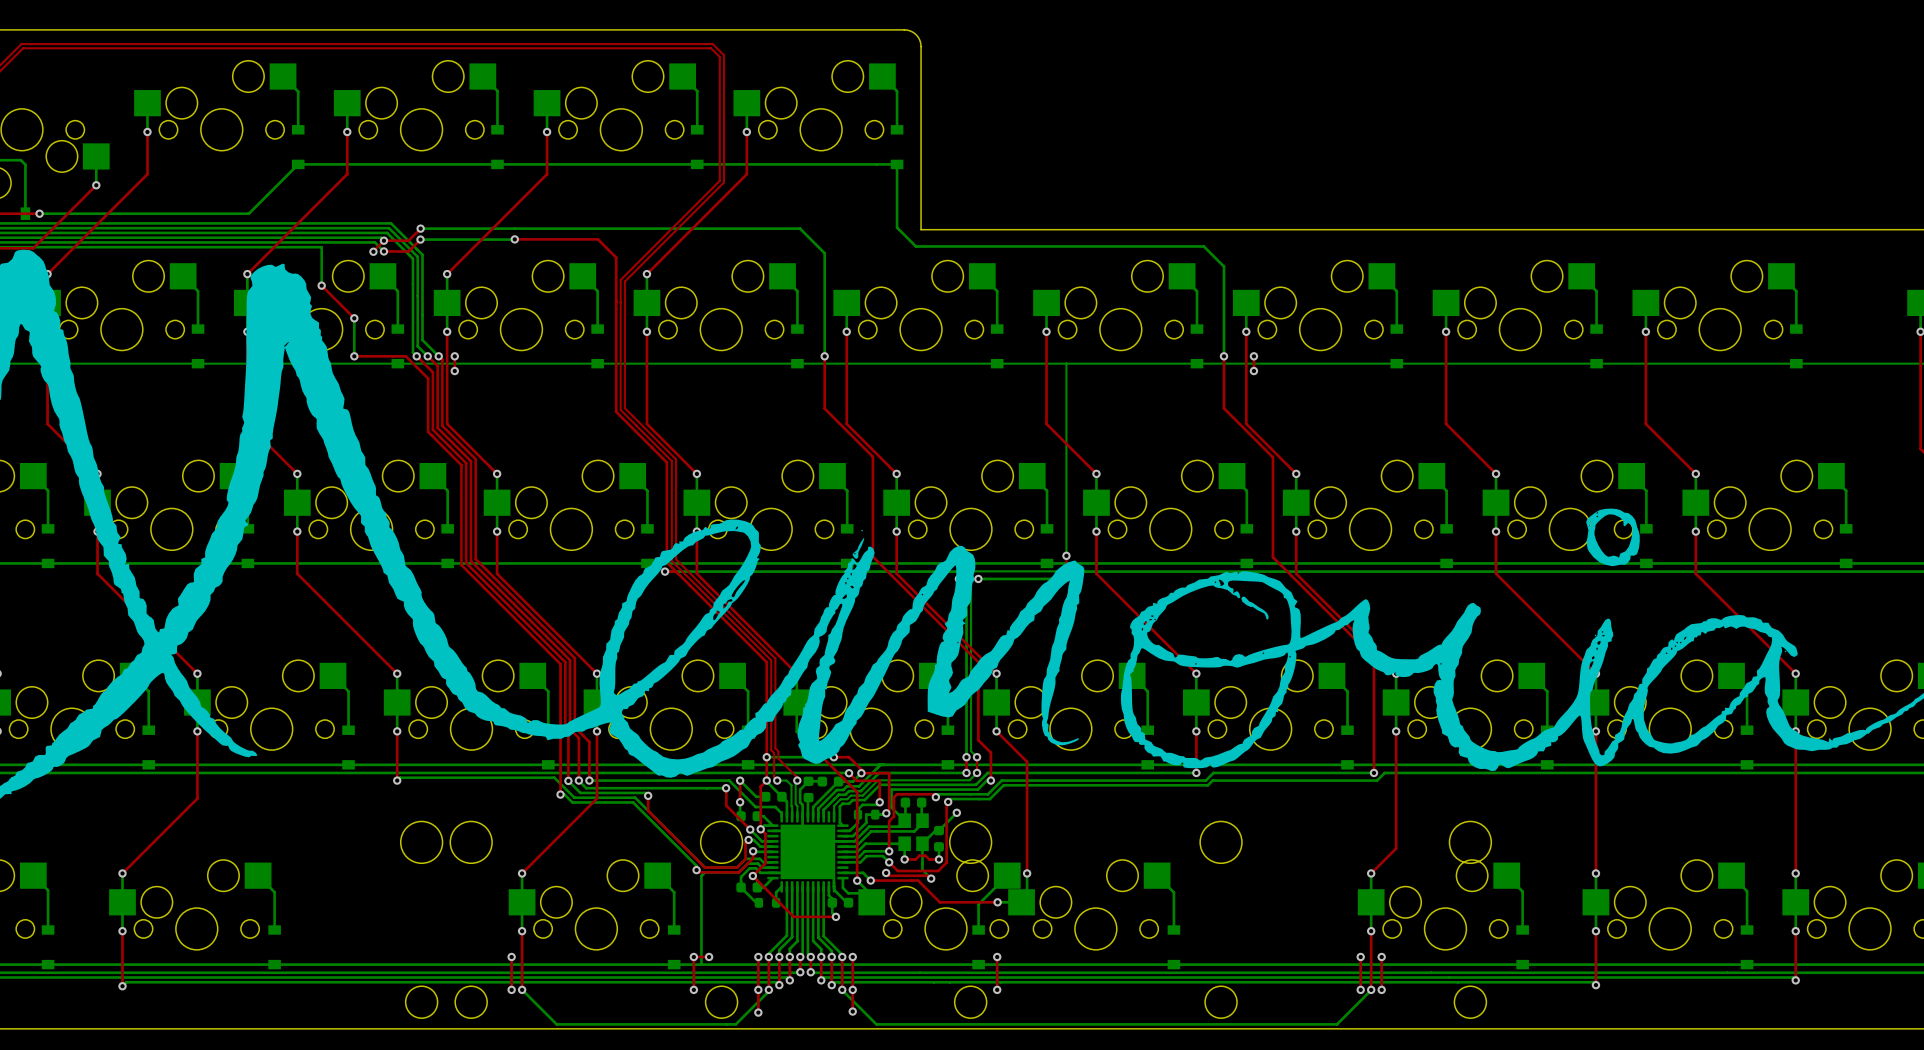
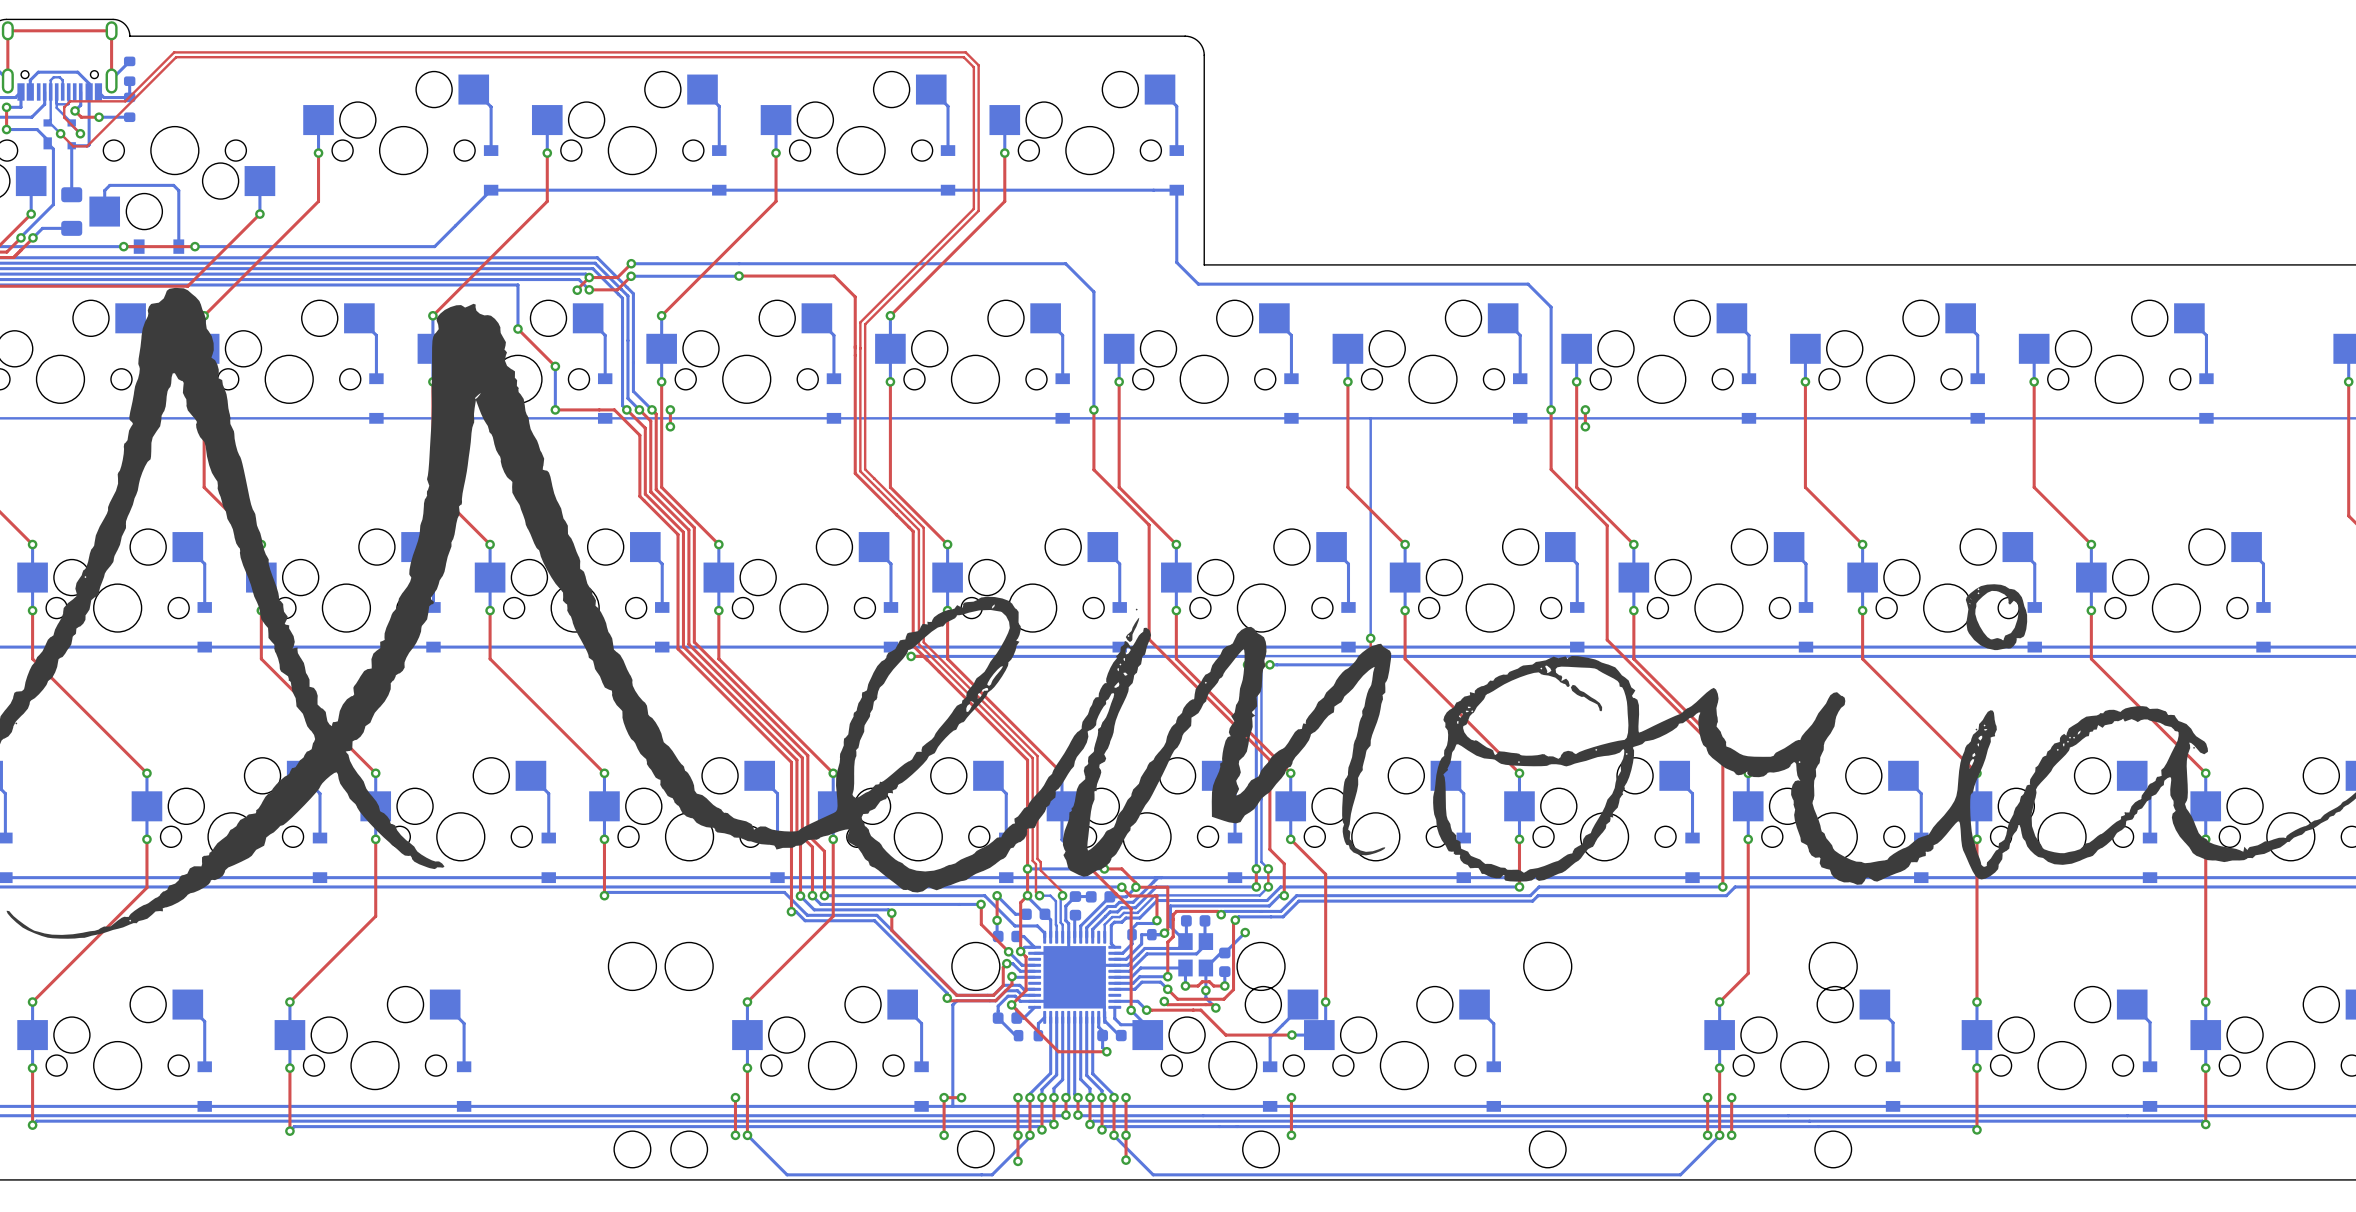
via: none -> (1205, 990)

